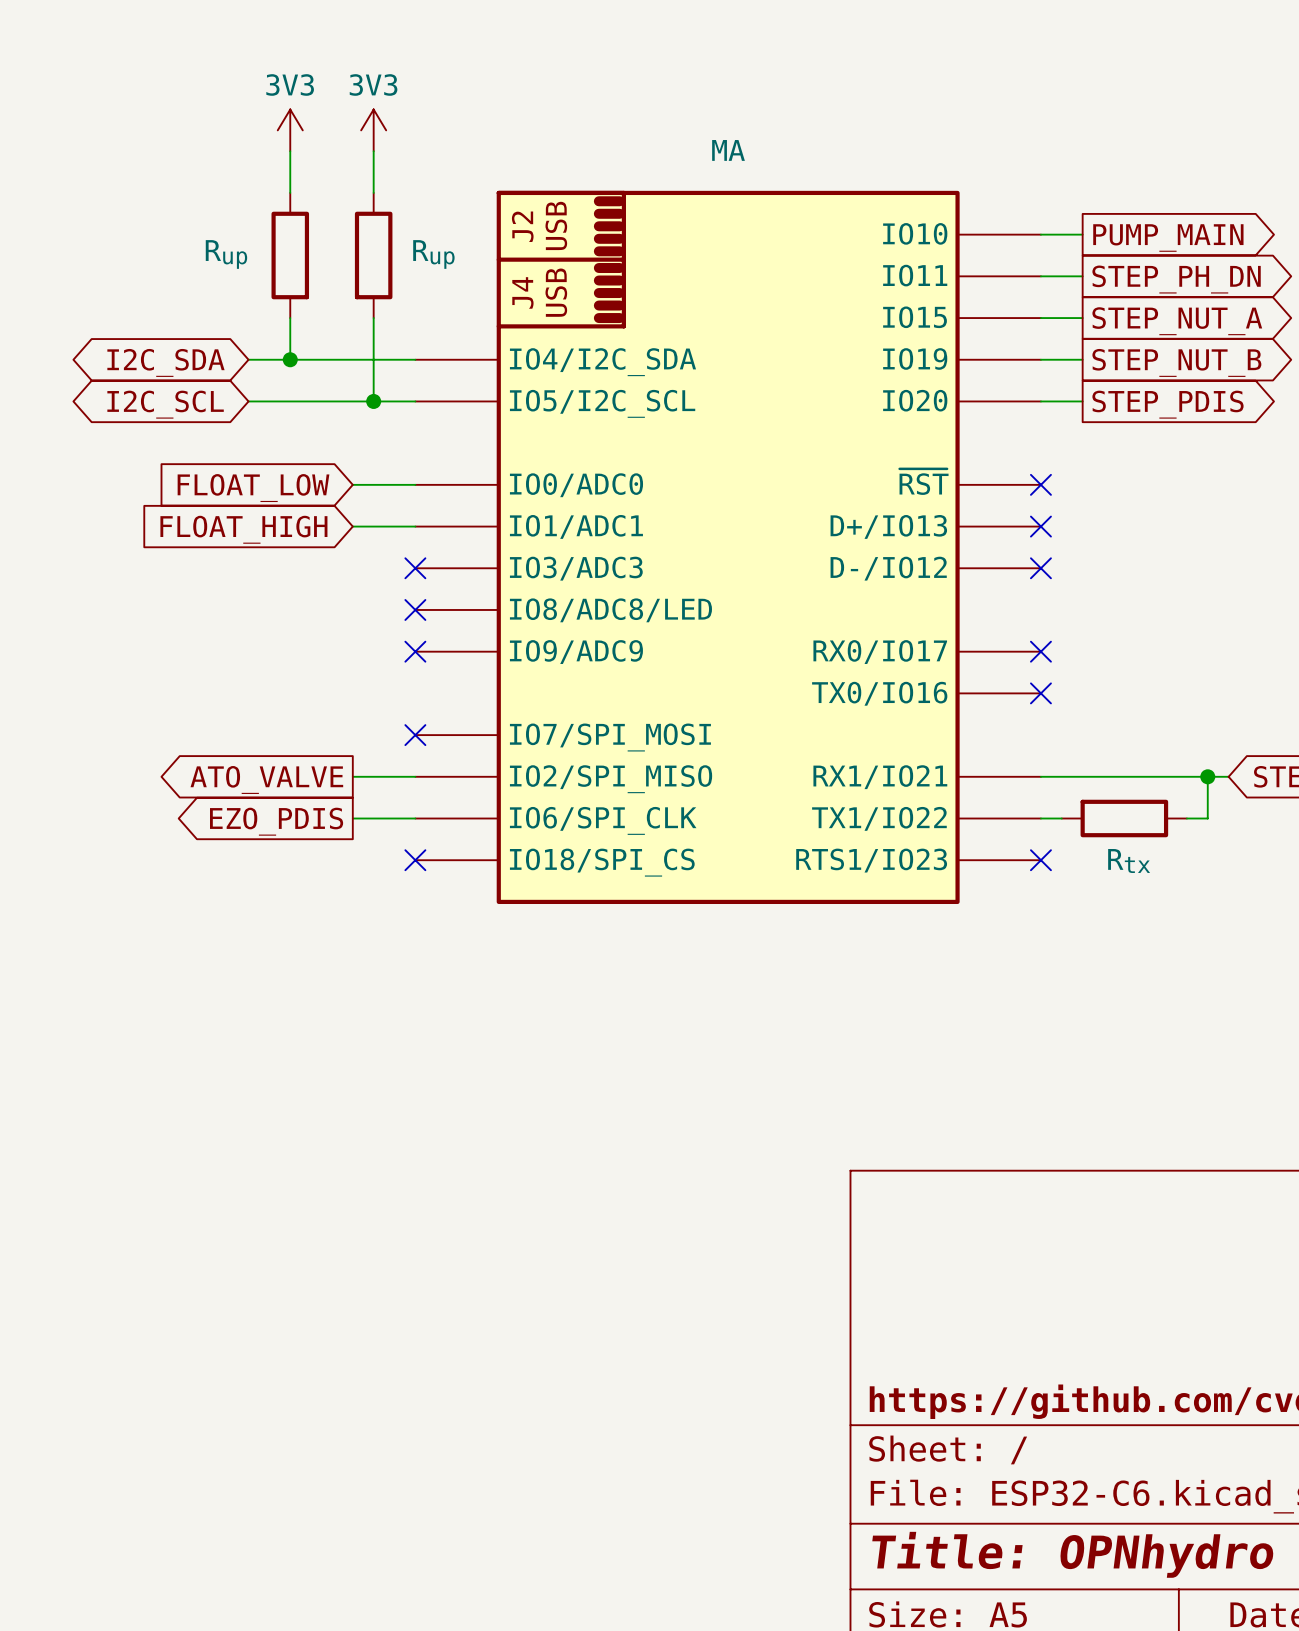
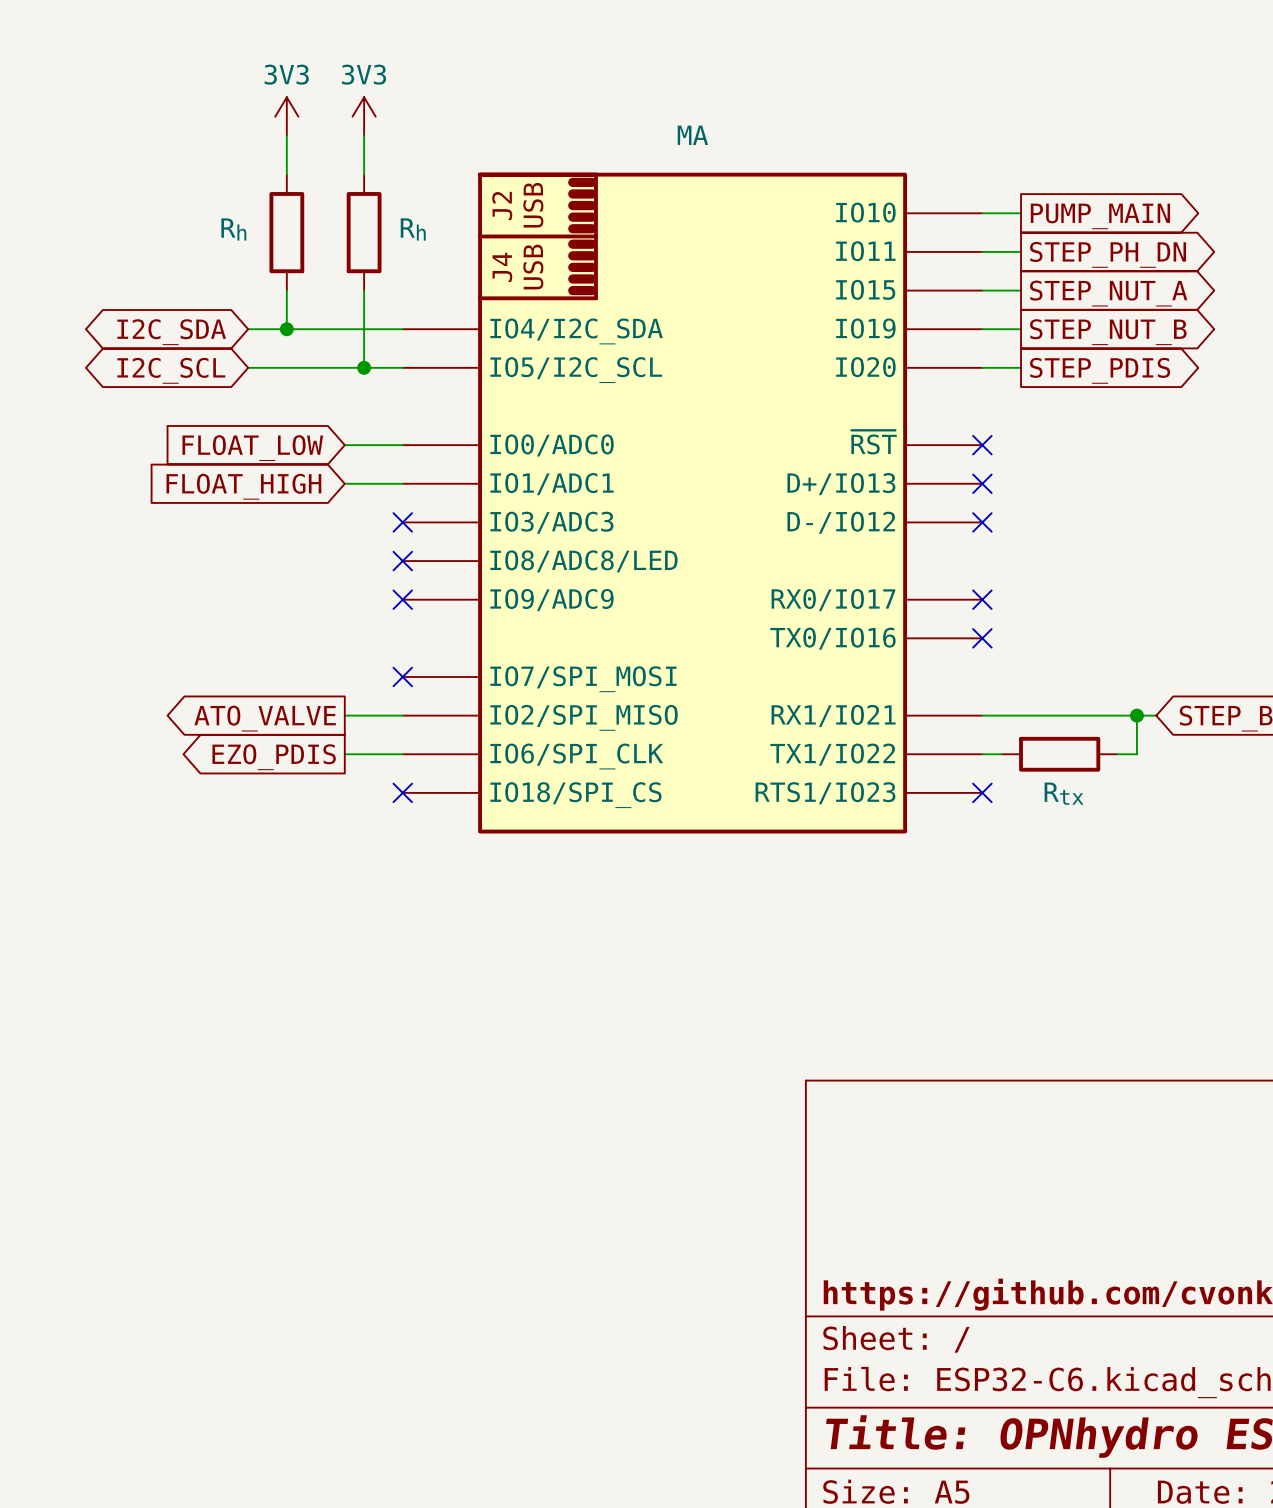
Rup name: Rup (226, 254) -> Rh (233, 229)
Rup name: Rup (433, 254) -> Rh (413, 229)

